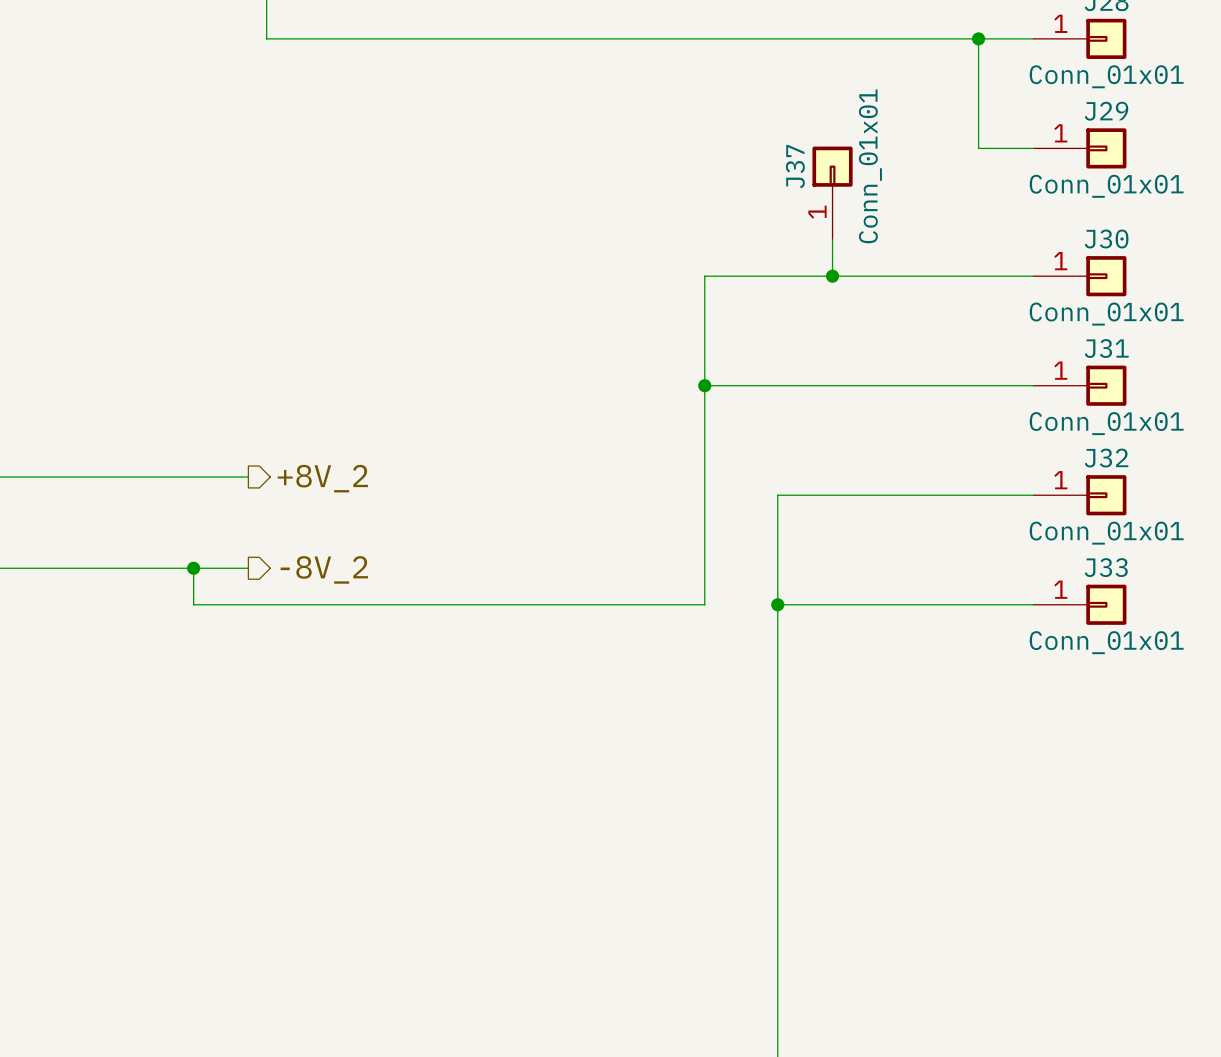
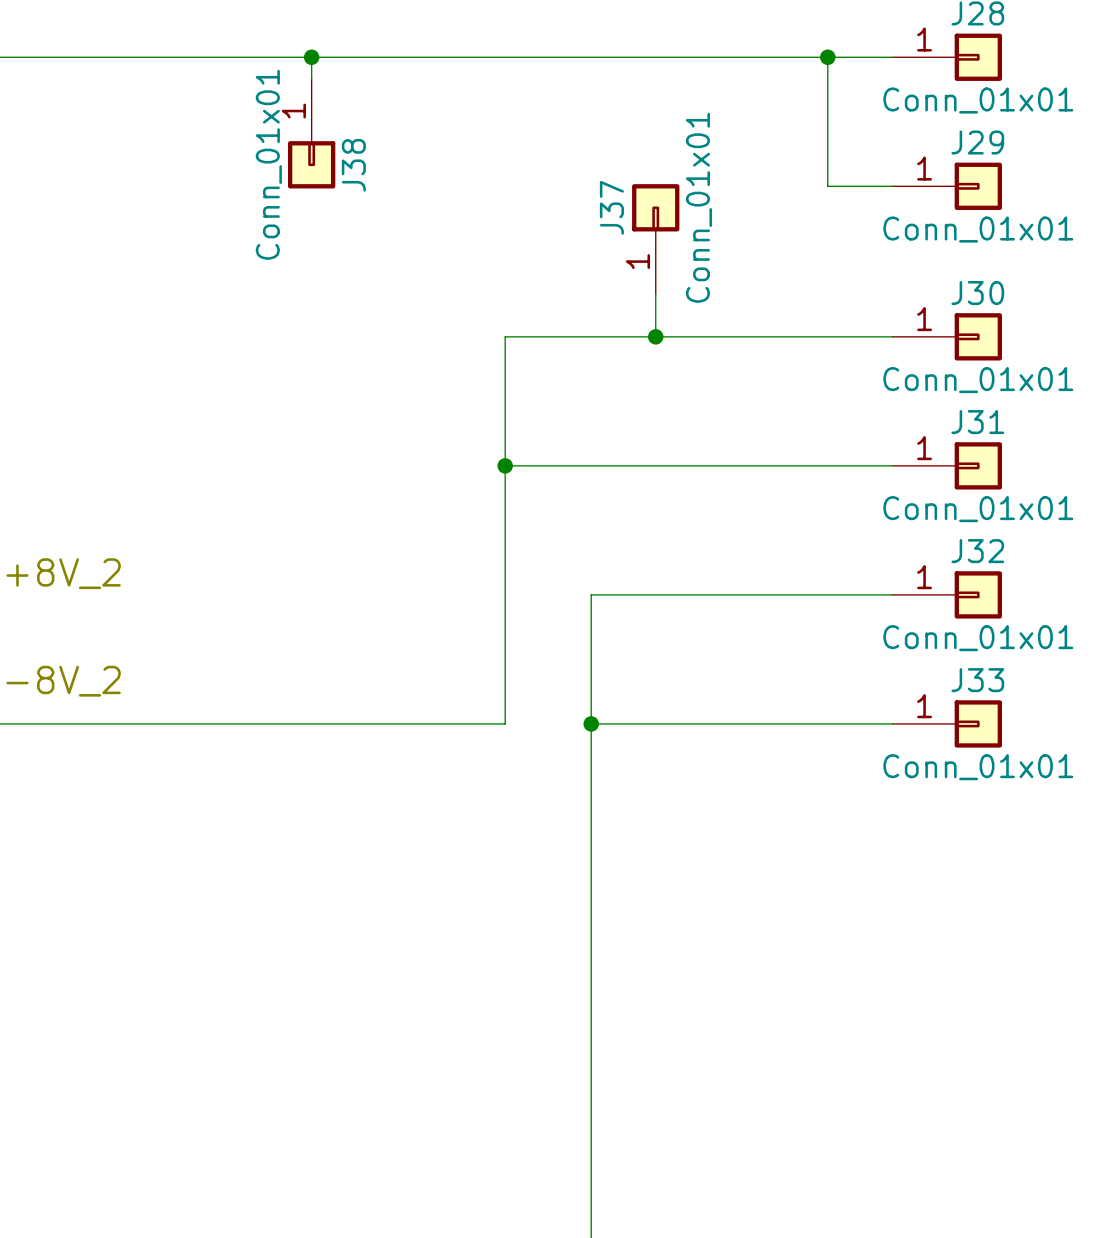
wire: none -> (311, 57) (311, 78)
junction: none -> (311, 57)
J38: none -> Conn_01x01 (311, 133)

